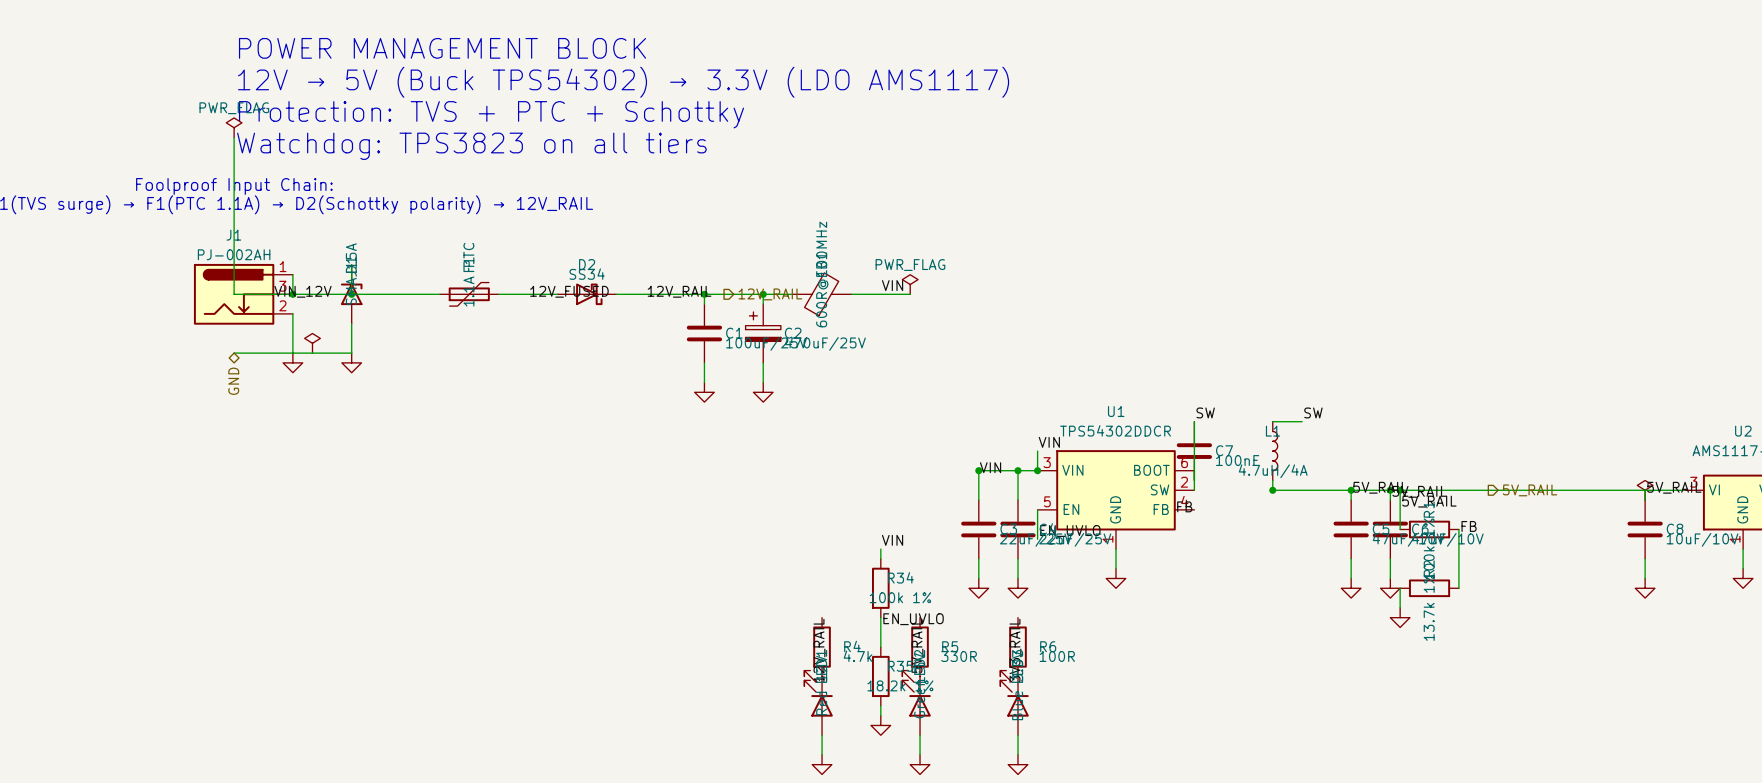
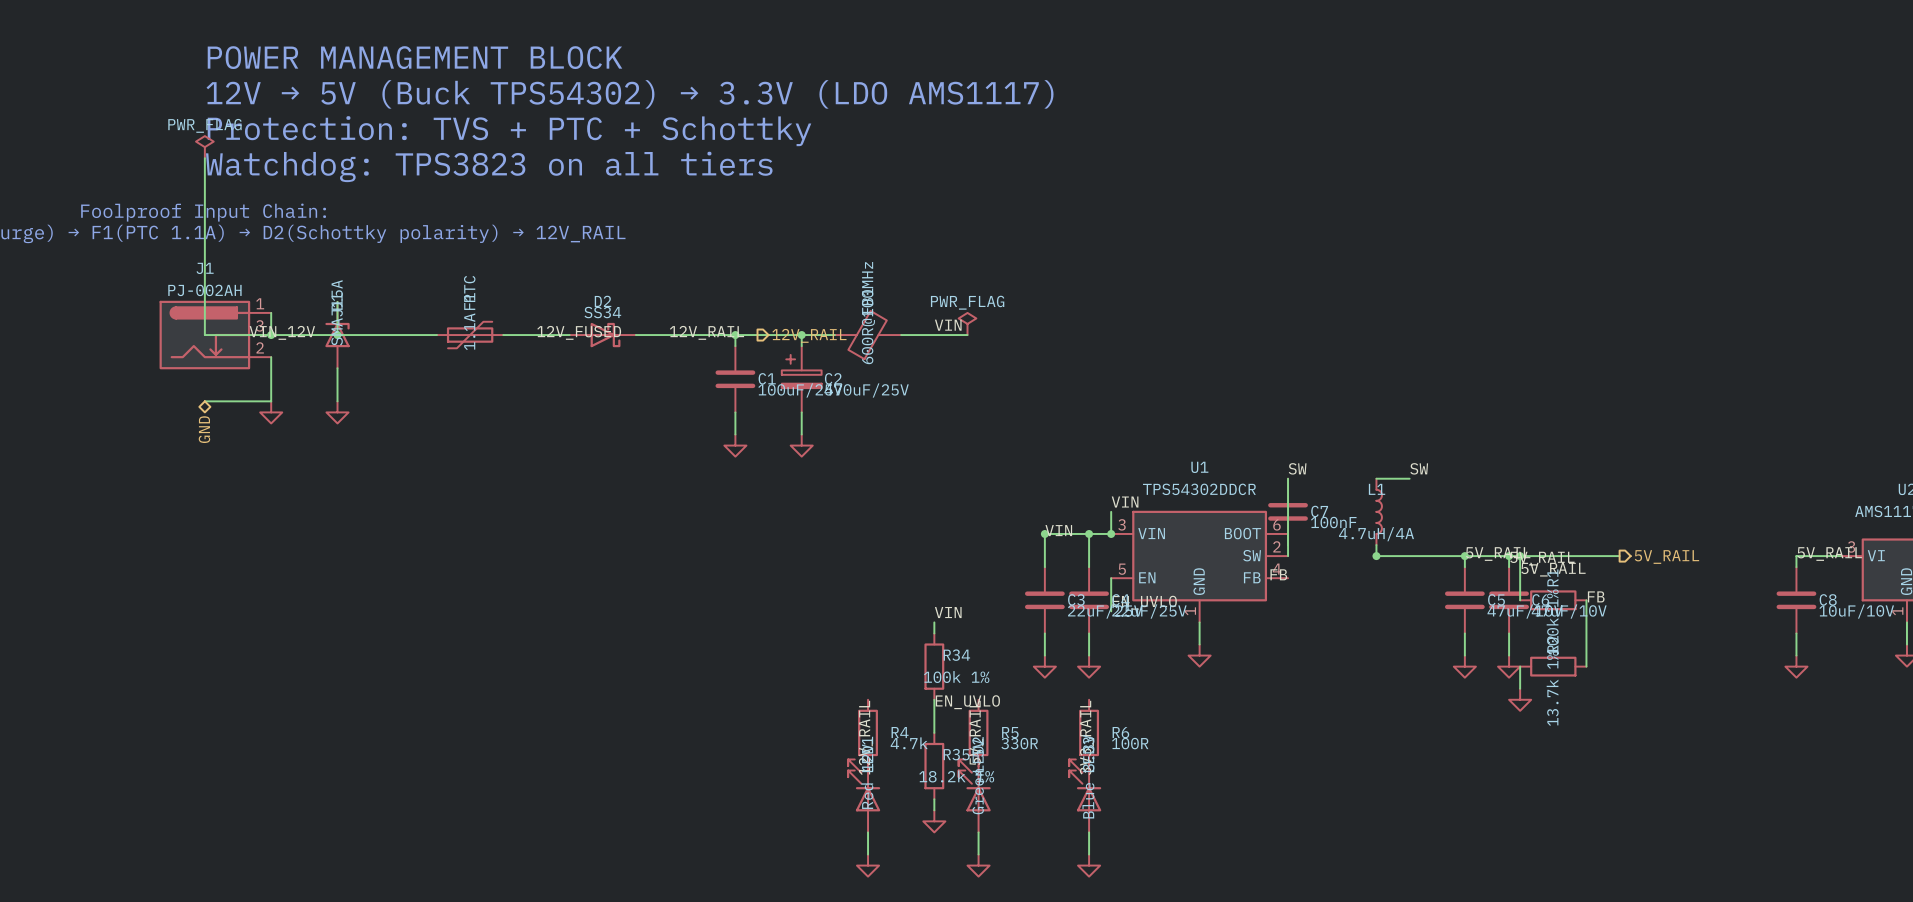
power symbol: (312, 343) -> none
wire: (292, 353) (351, 353) -> none
wire: (1488, 490) (1645, 490) -> none
power symbol: (1645, 490) -> none

